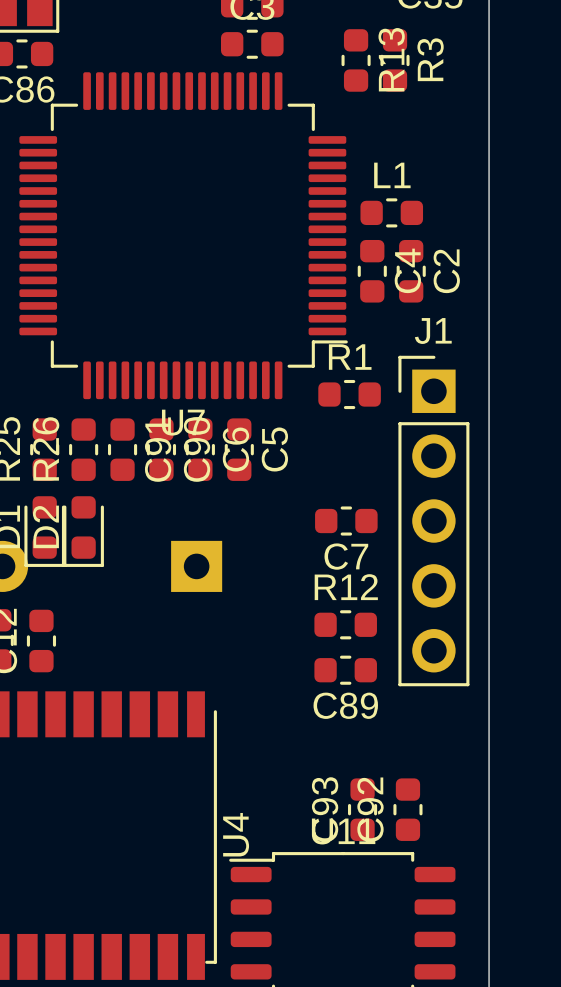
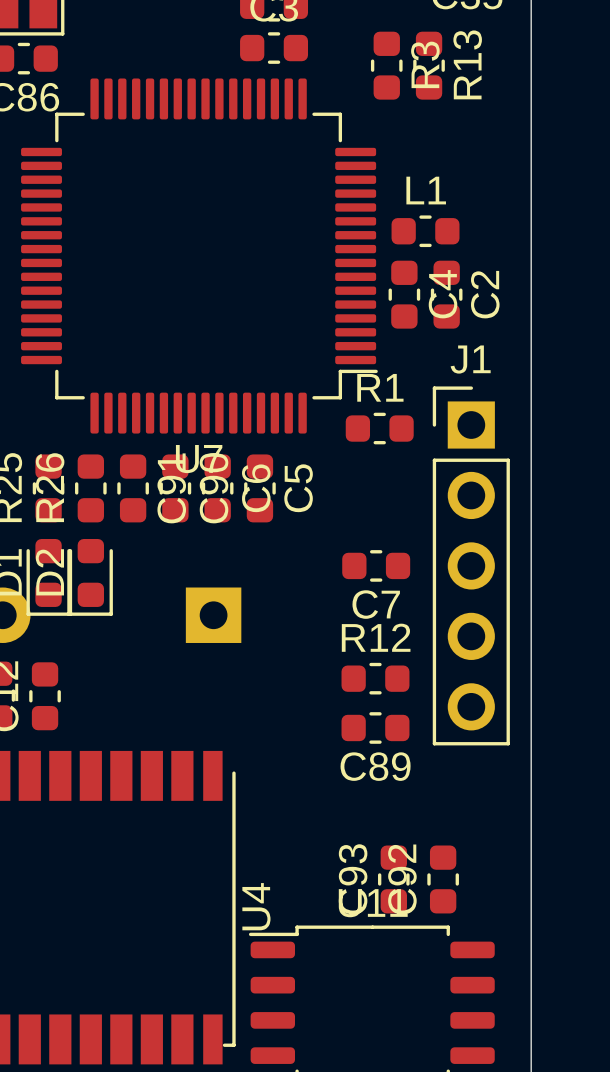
R13 name: R13 (391, 59) -> R3 (425, 64)
R3 name: R3 (430, 59) -> R13 (467, 64)

